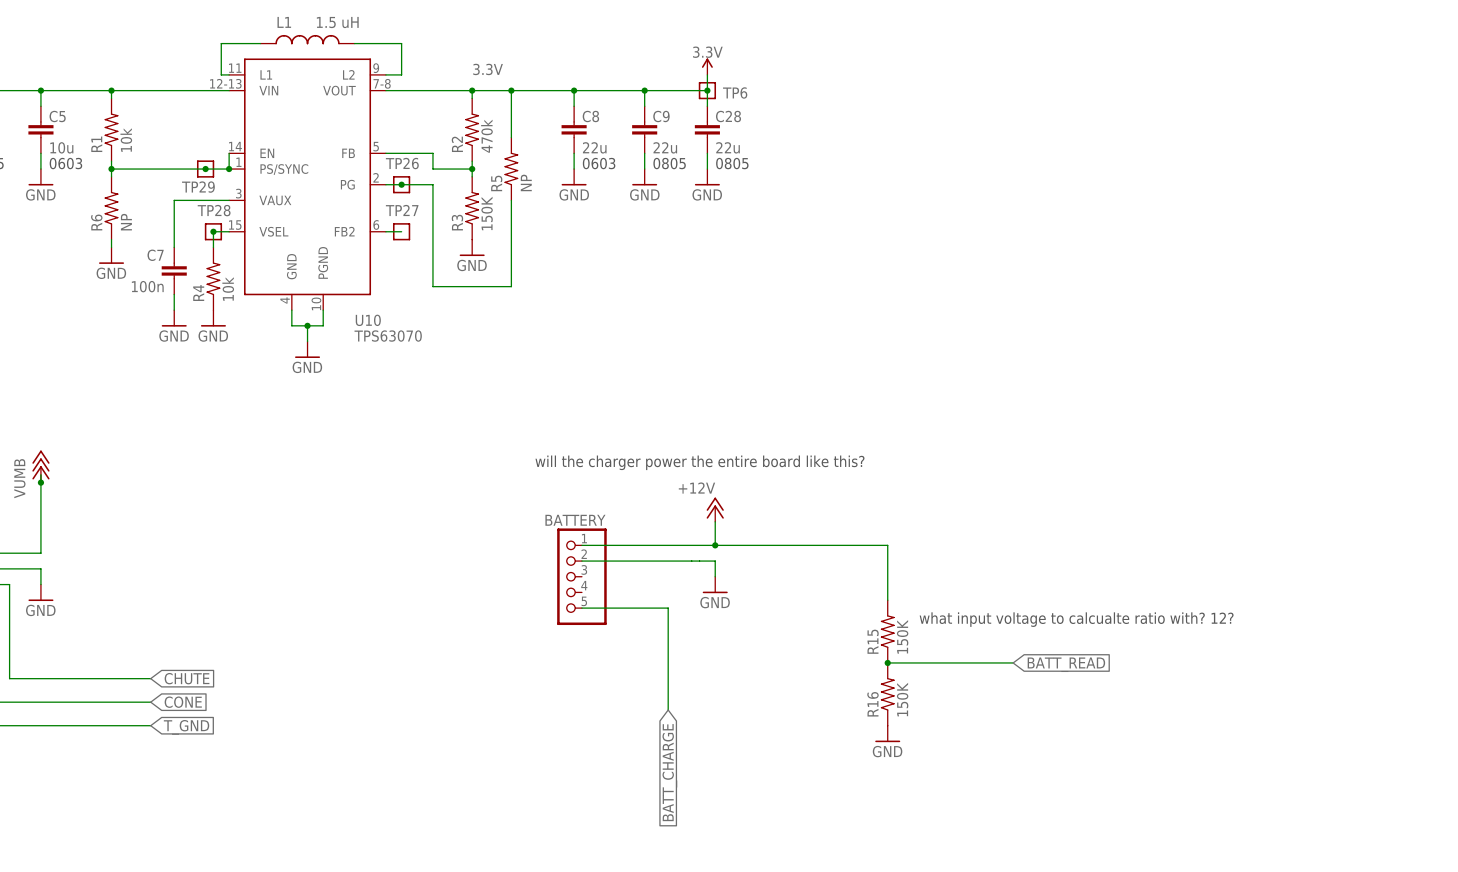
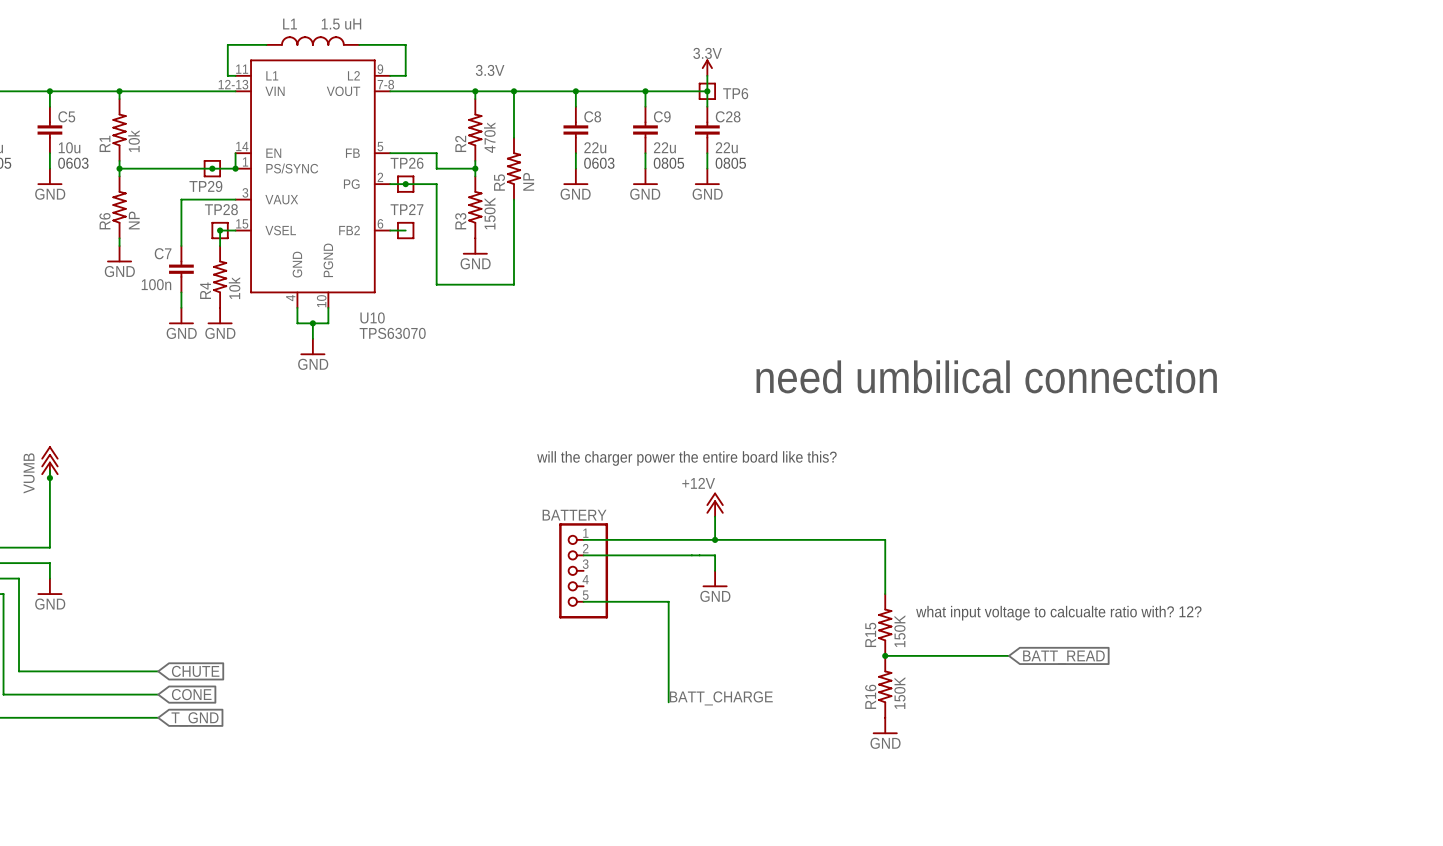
text: none -> need umbilical connection (986, 376)
label: none -> BATT_CHARGE (721, 698)
global label: BATT_CHARGE (669, 772) -> none

